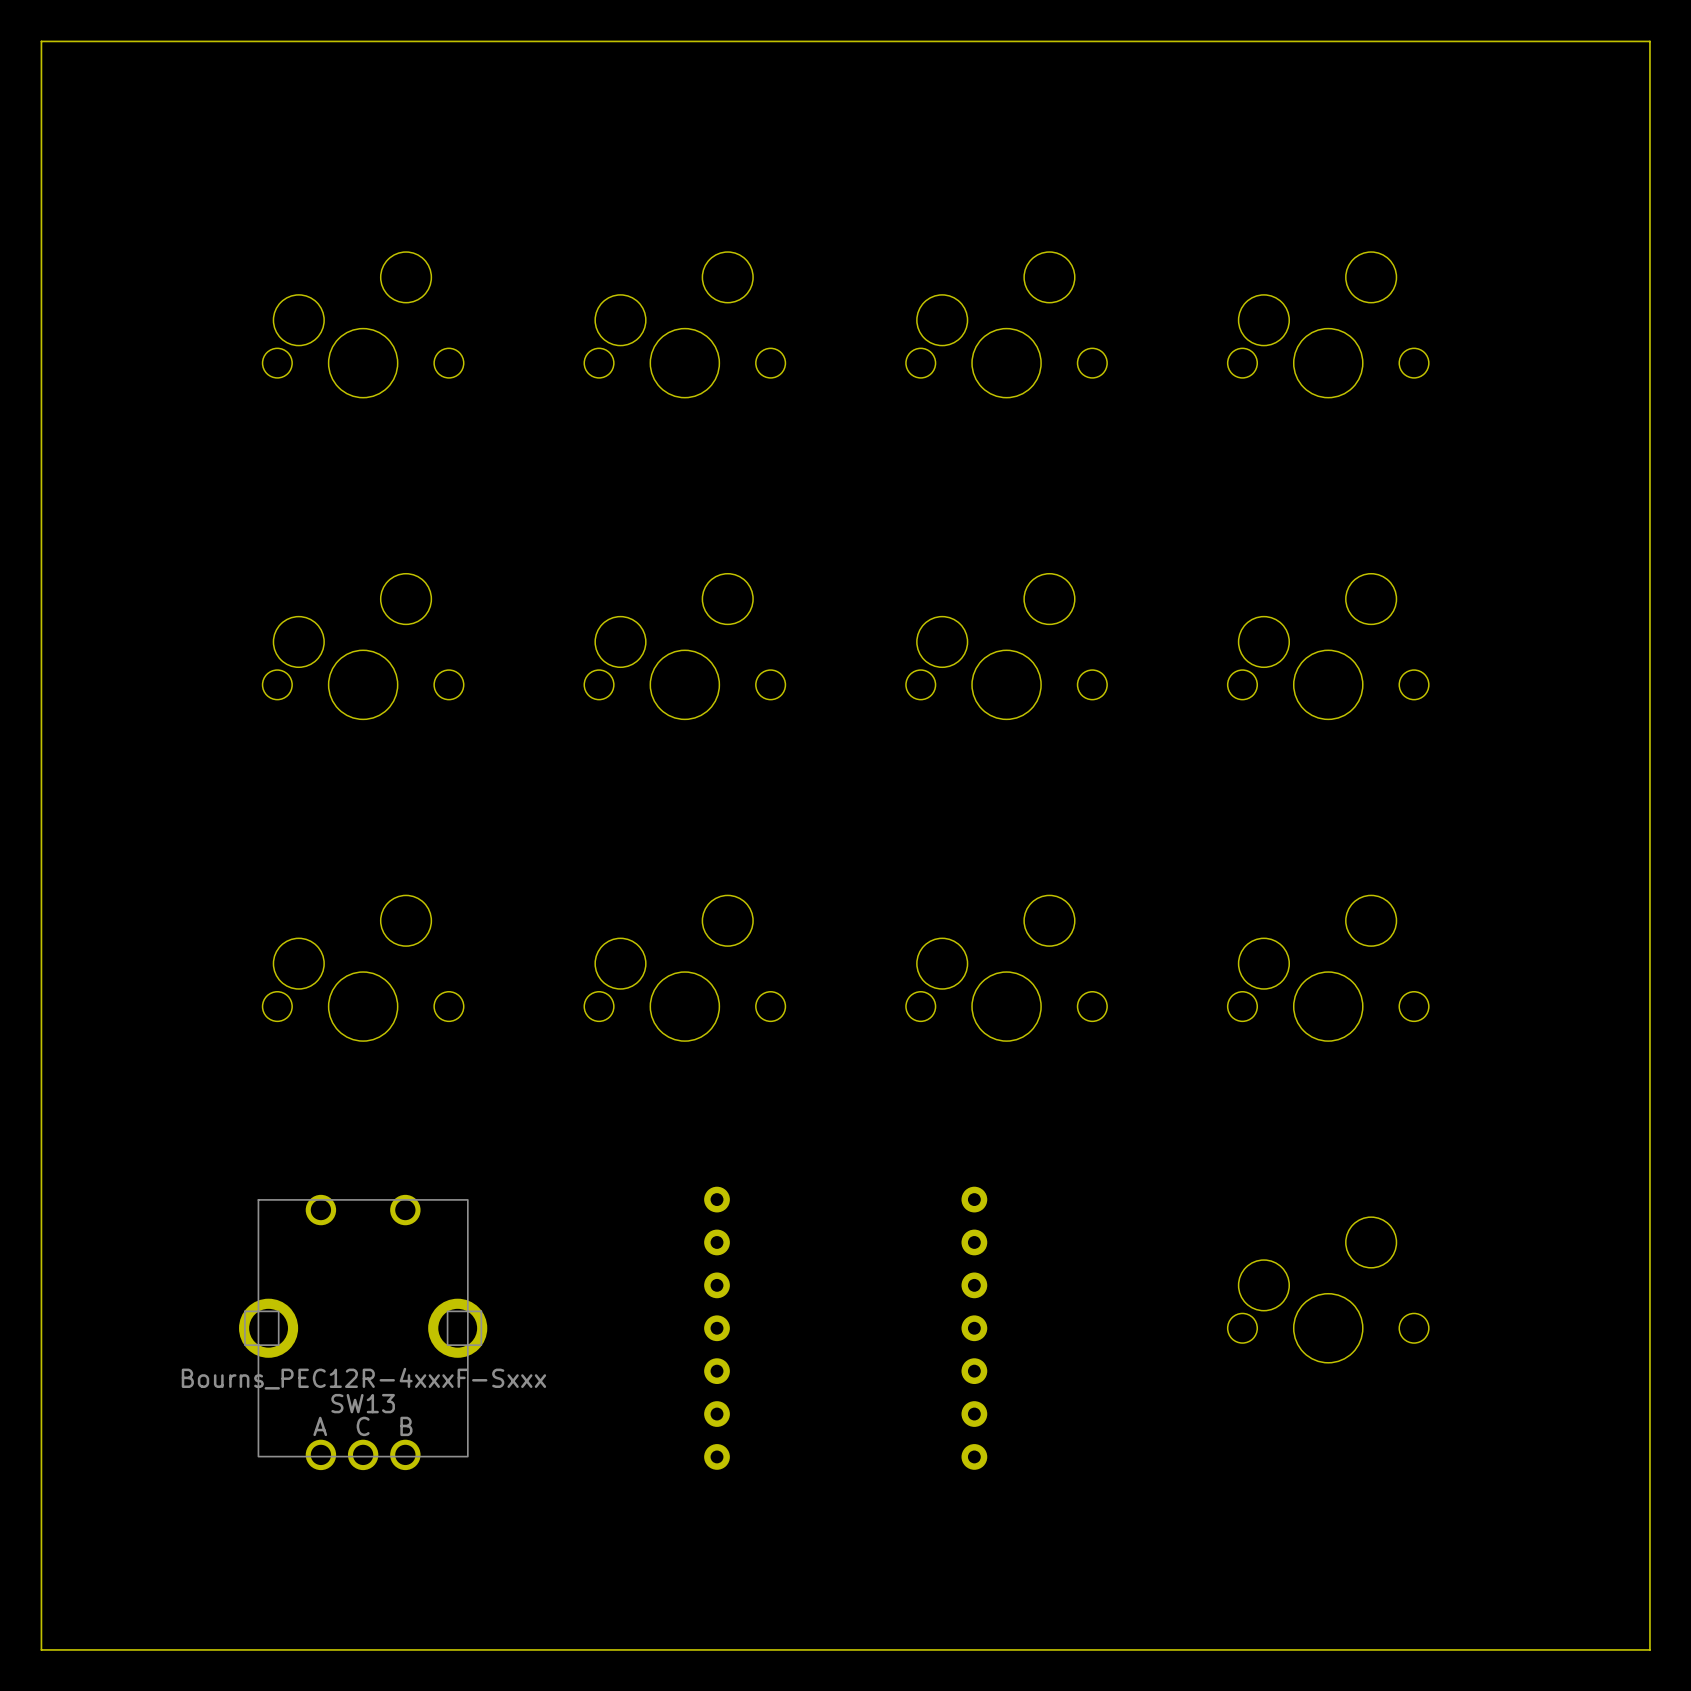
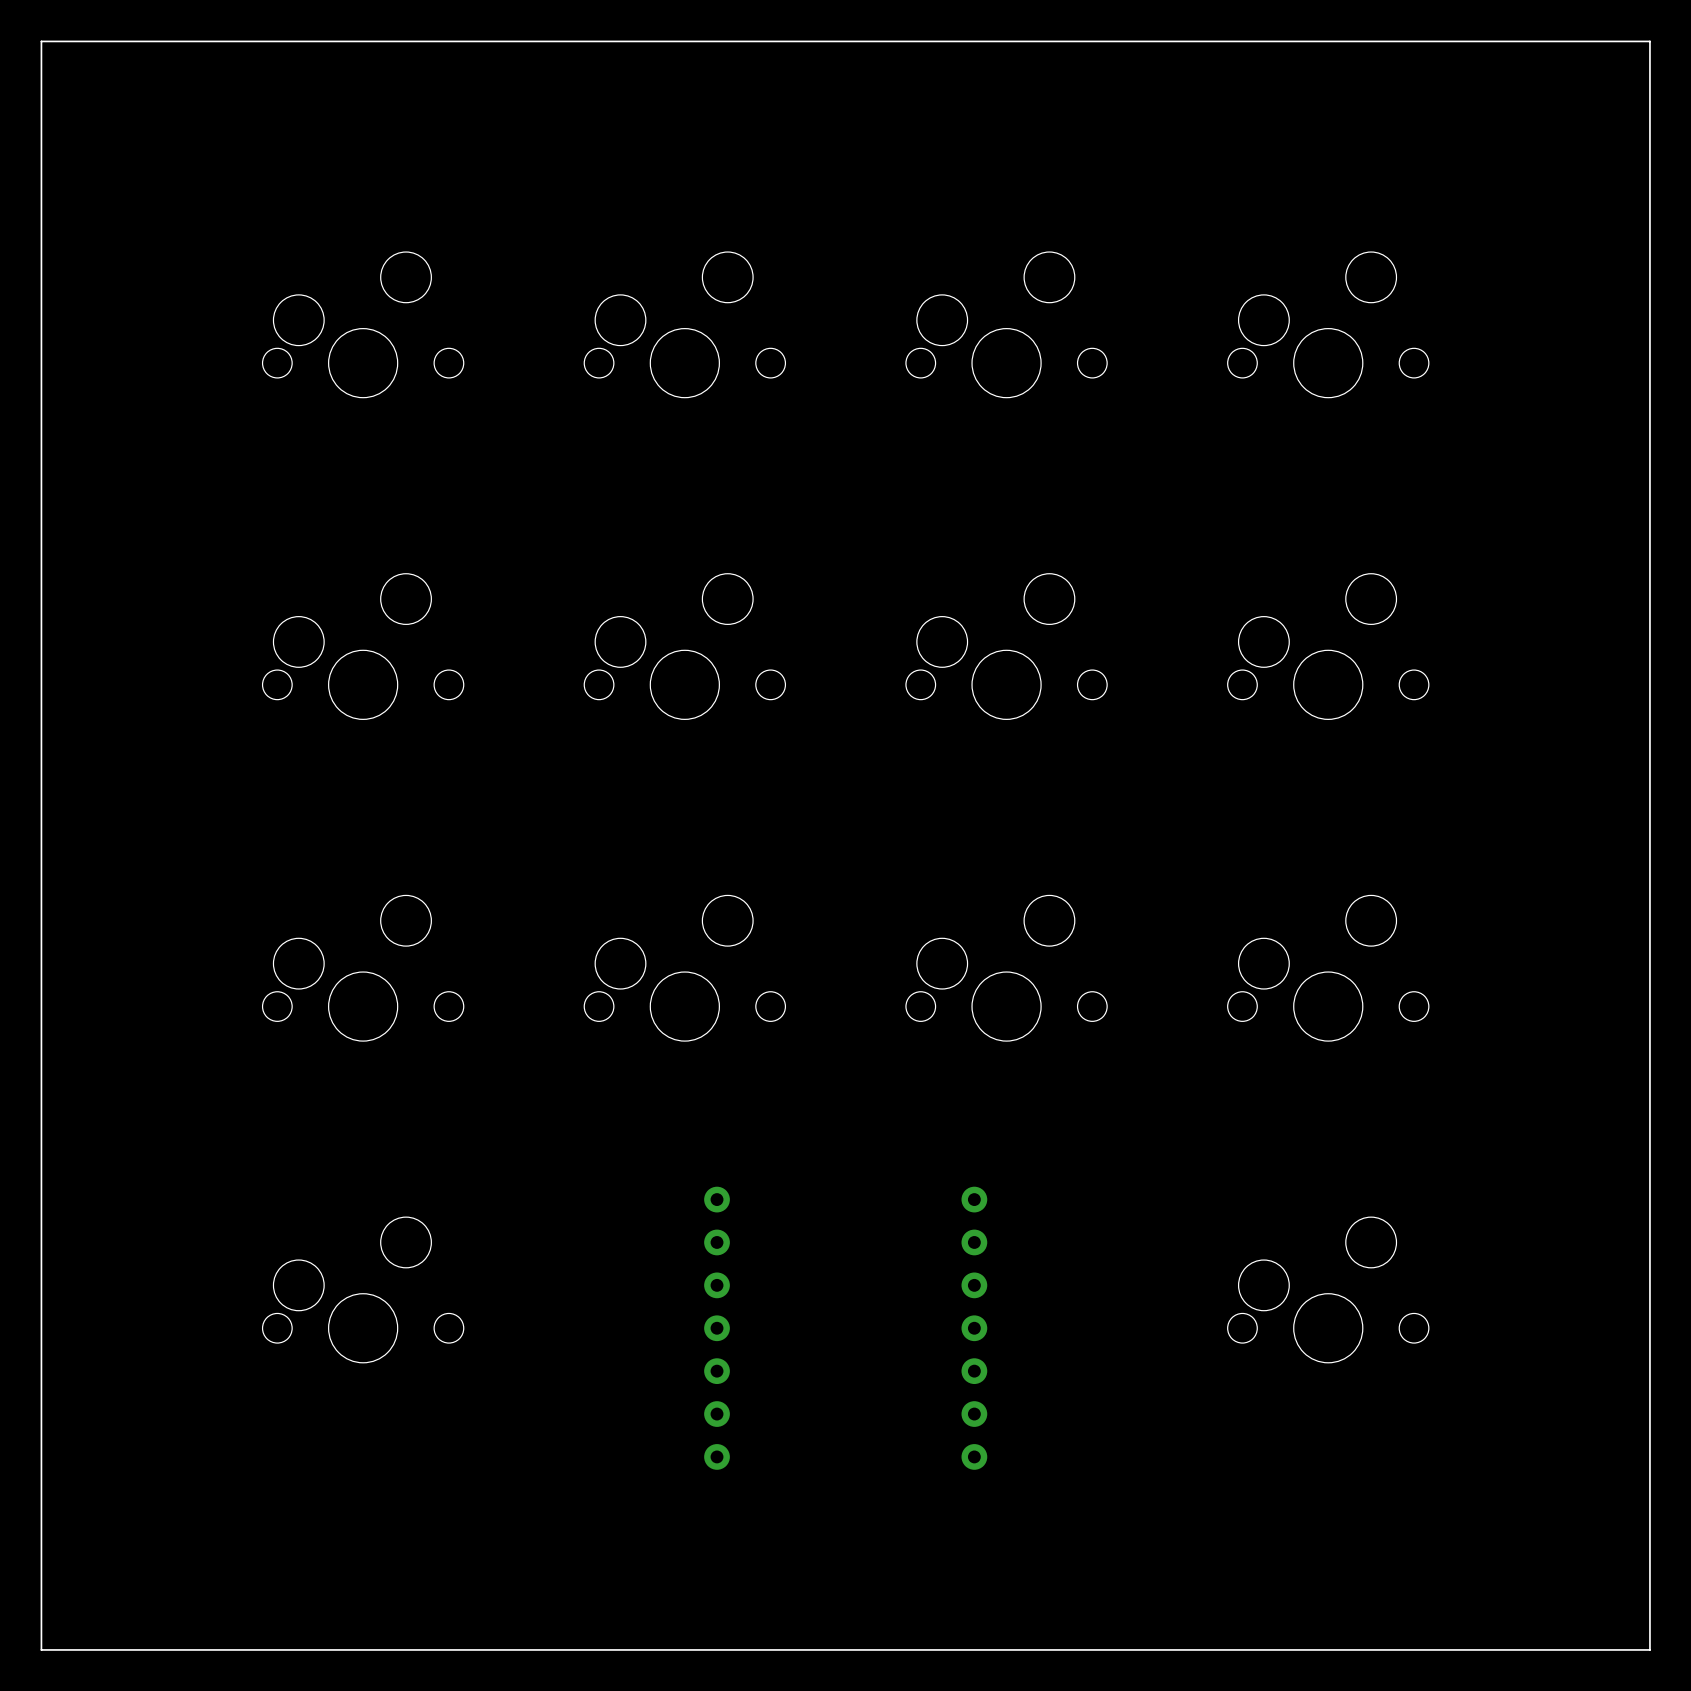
part: none -> (363, 1289)
SW13: Bourns_PEC12R-4xxxF-Sxxx (363, 1332) -> none

